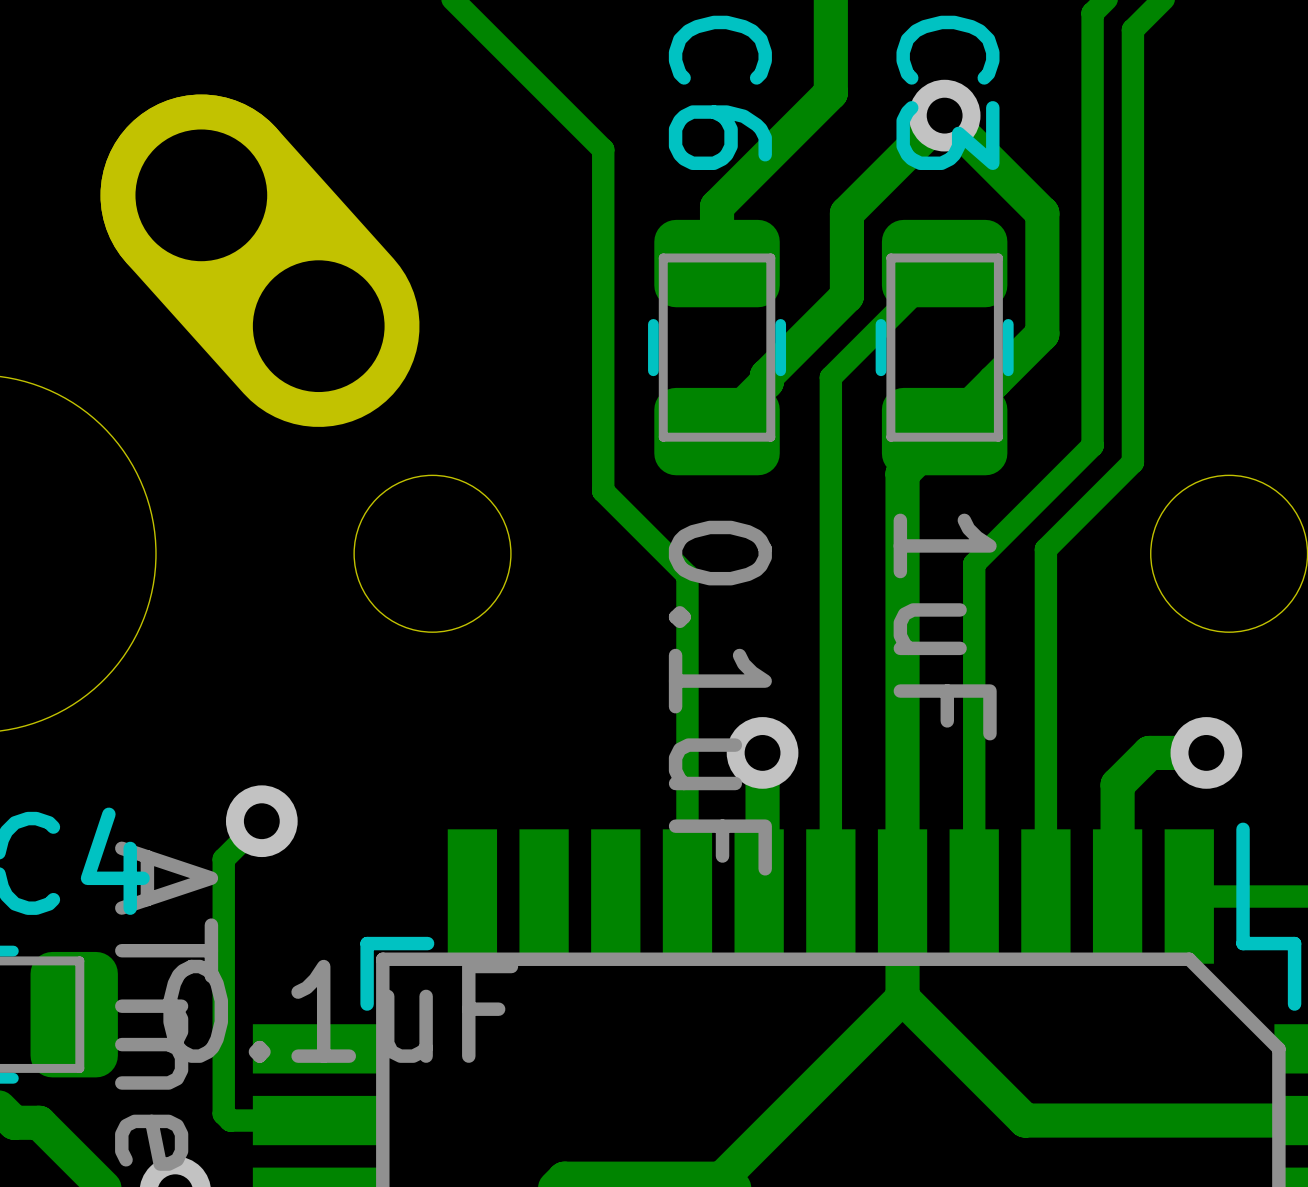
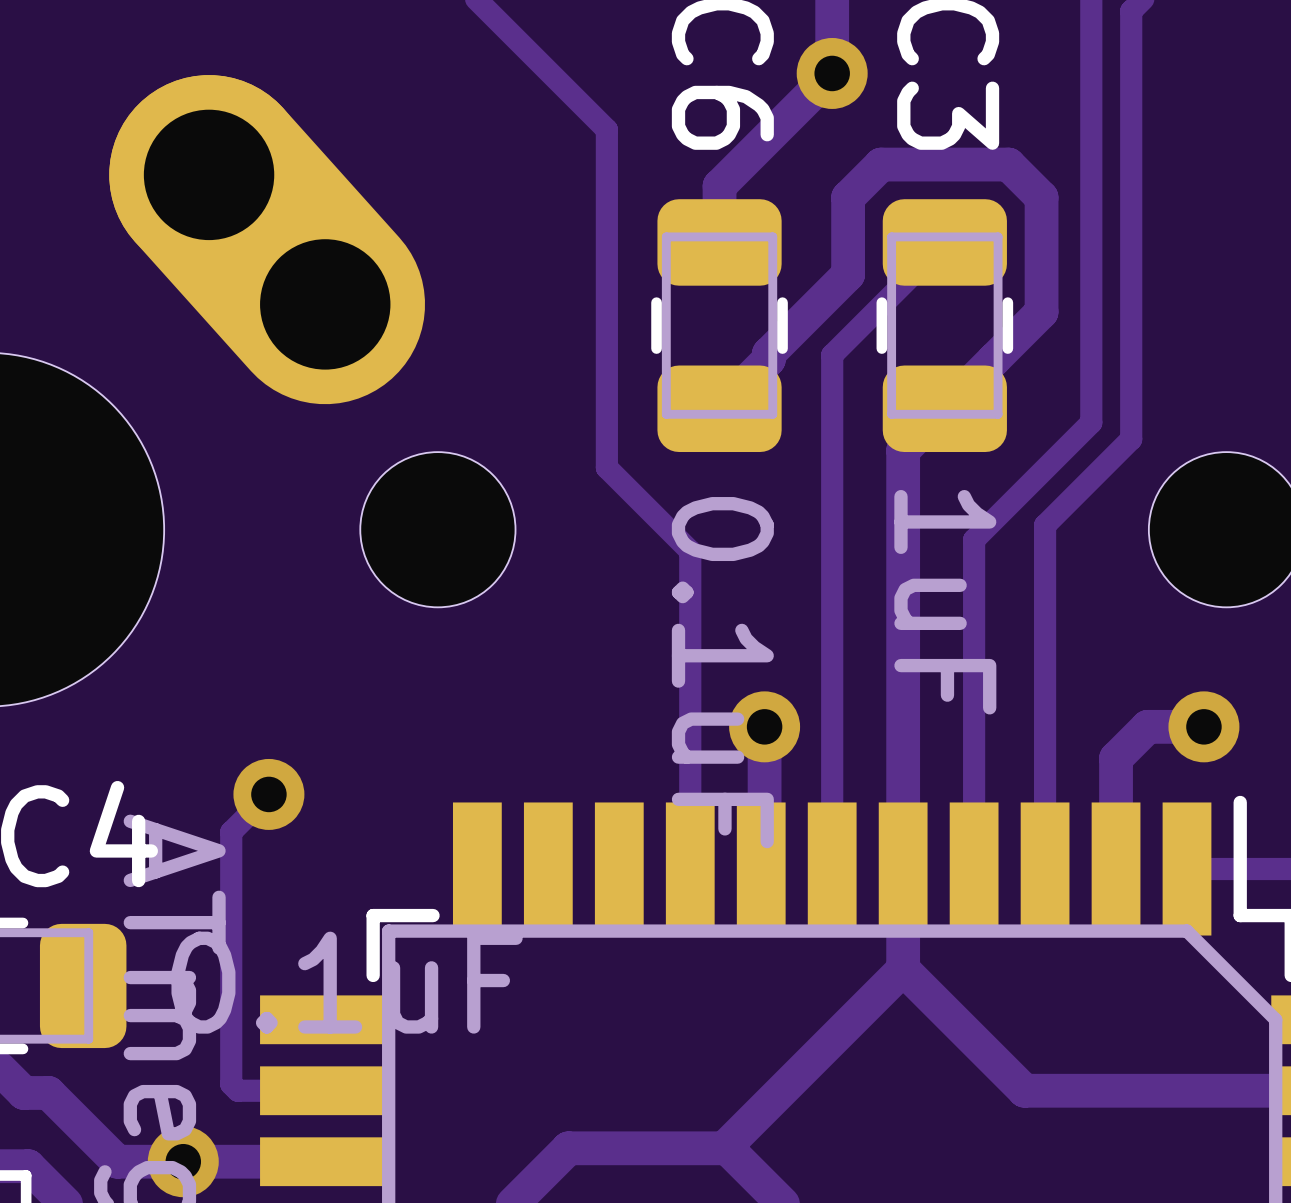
via position: (944, 115) -> (832, 73)
track: (1042, 218) (1042, 213) (944, 115) (846, 213) (846, 218) -> (1041, 197) (1008, 164) (881, 164) (848, 197)

